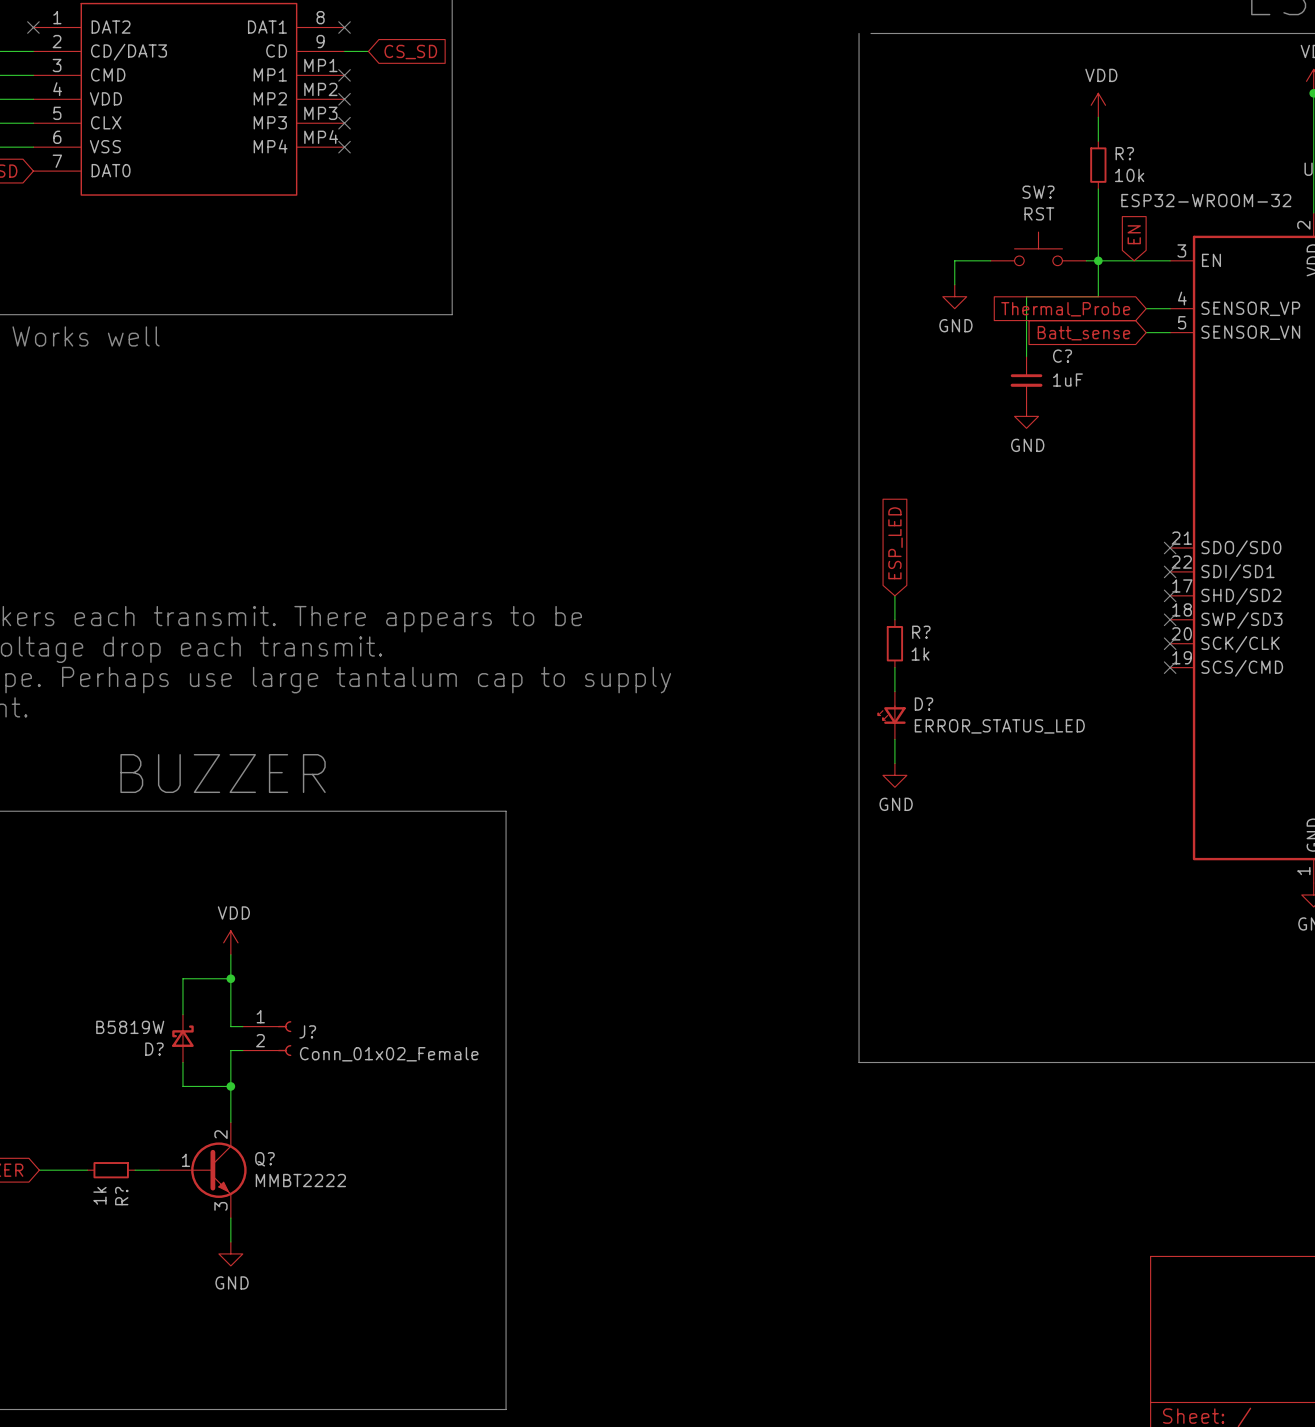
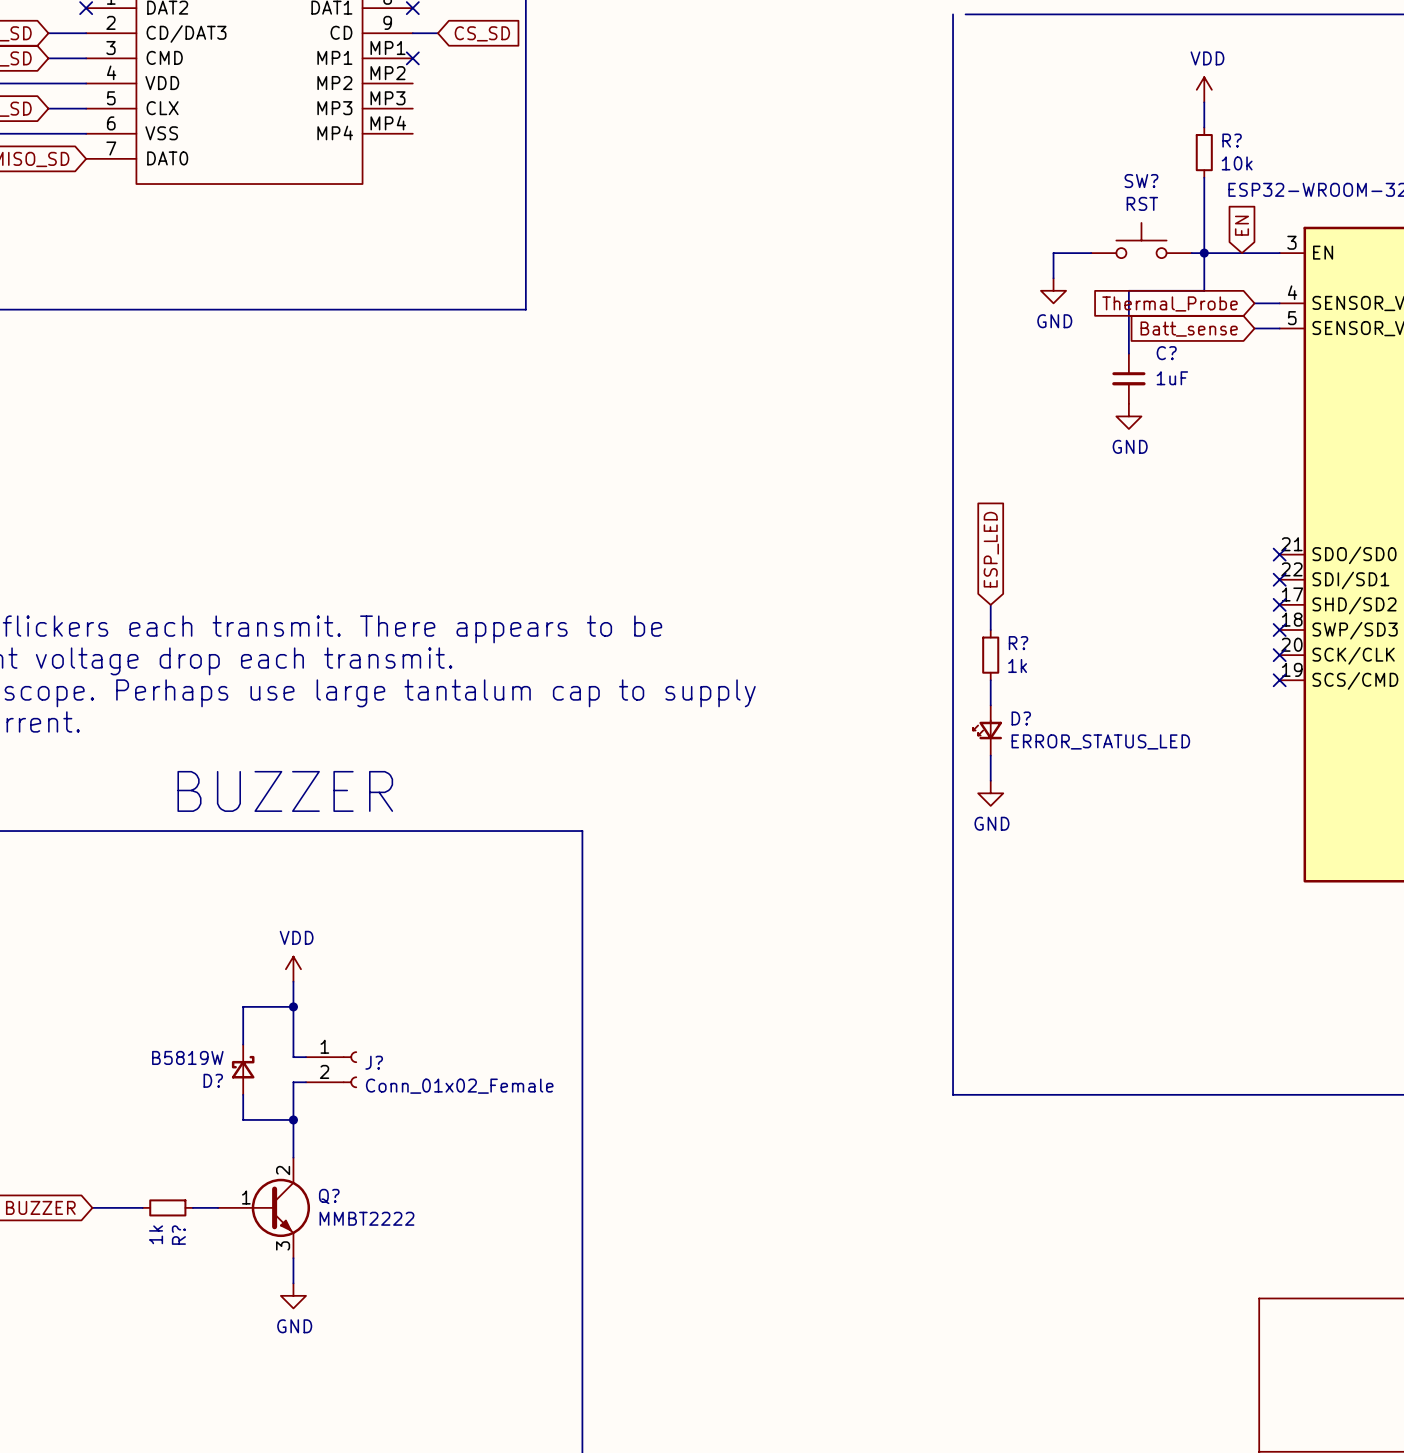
no-connect mark: (344, 99) -> none
no-connect mark: (344, 123) -> none
no-connect mark: (344, 147) -> none
text: Works well (86, 336) -> none

